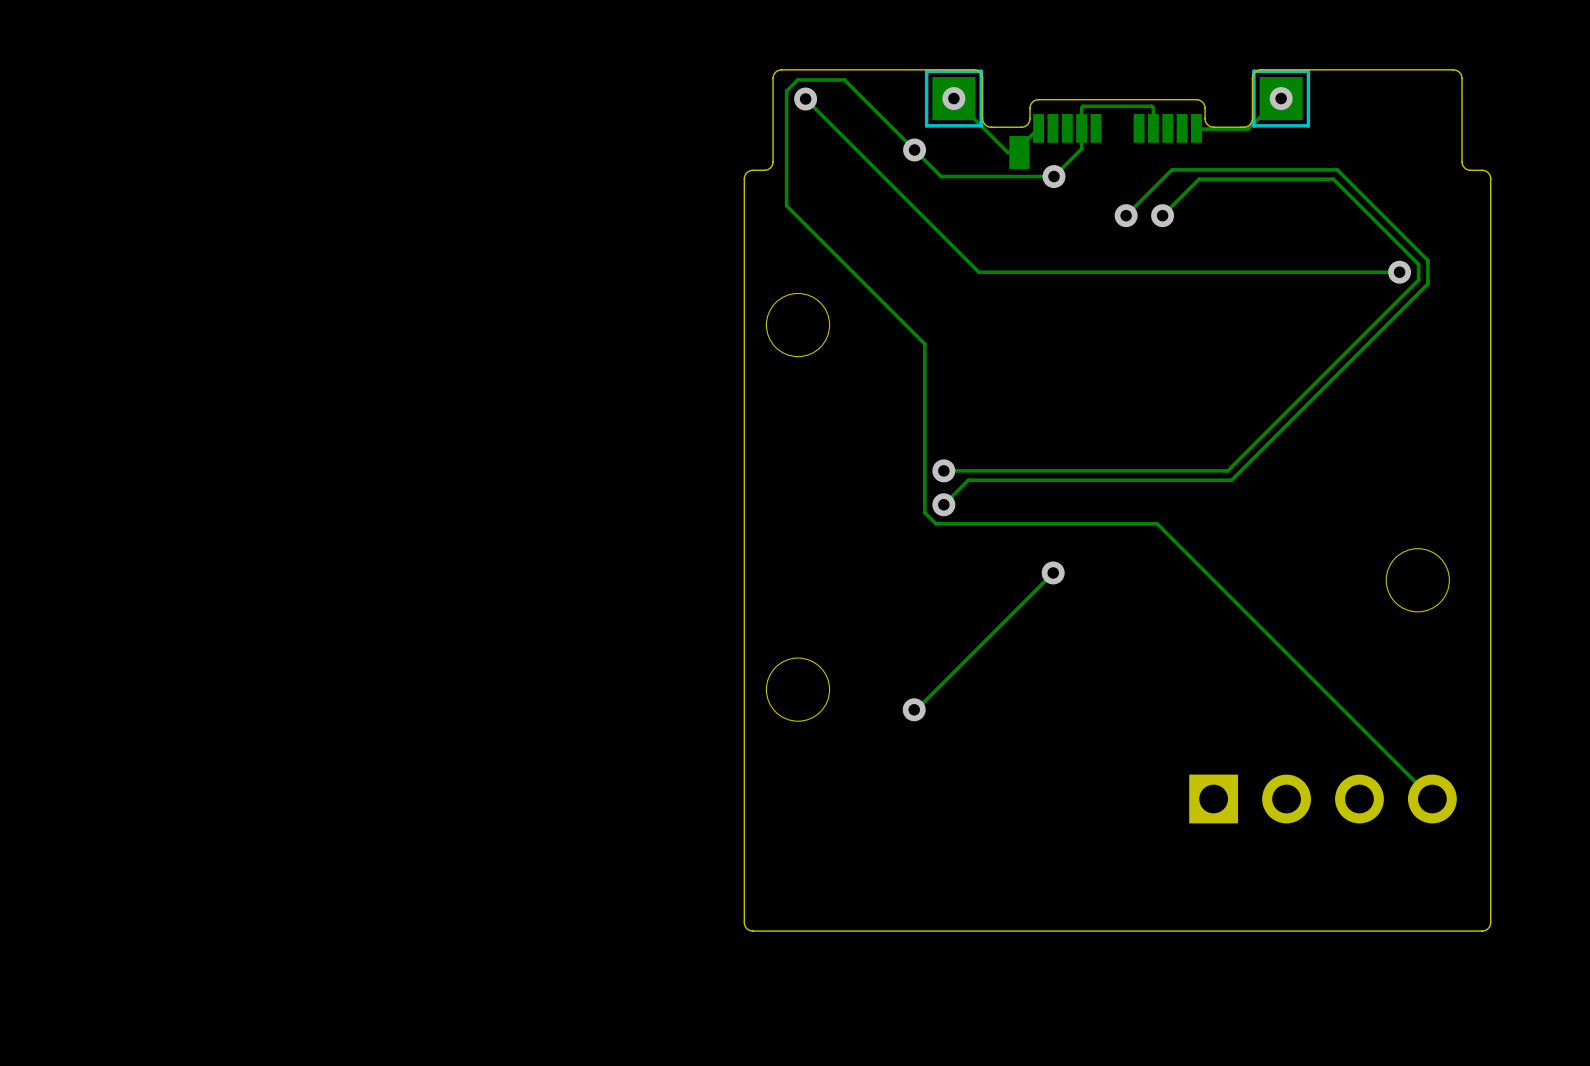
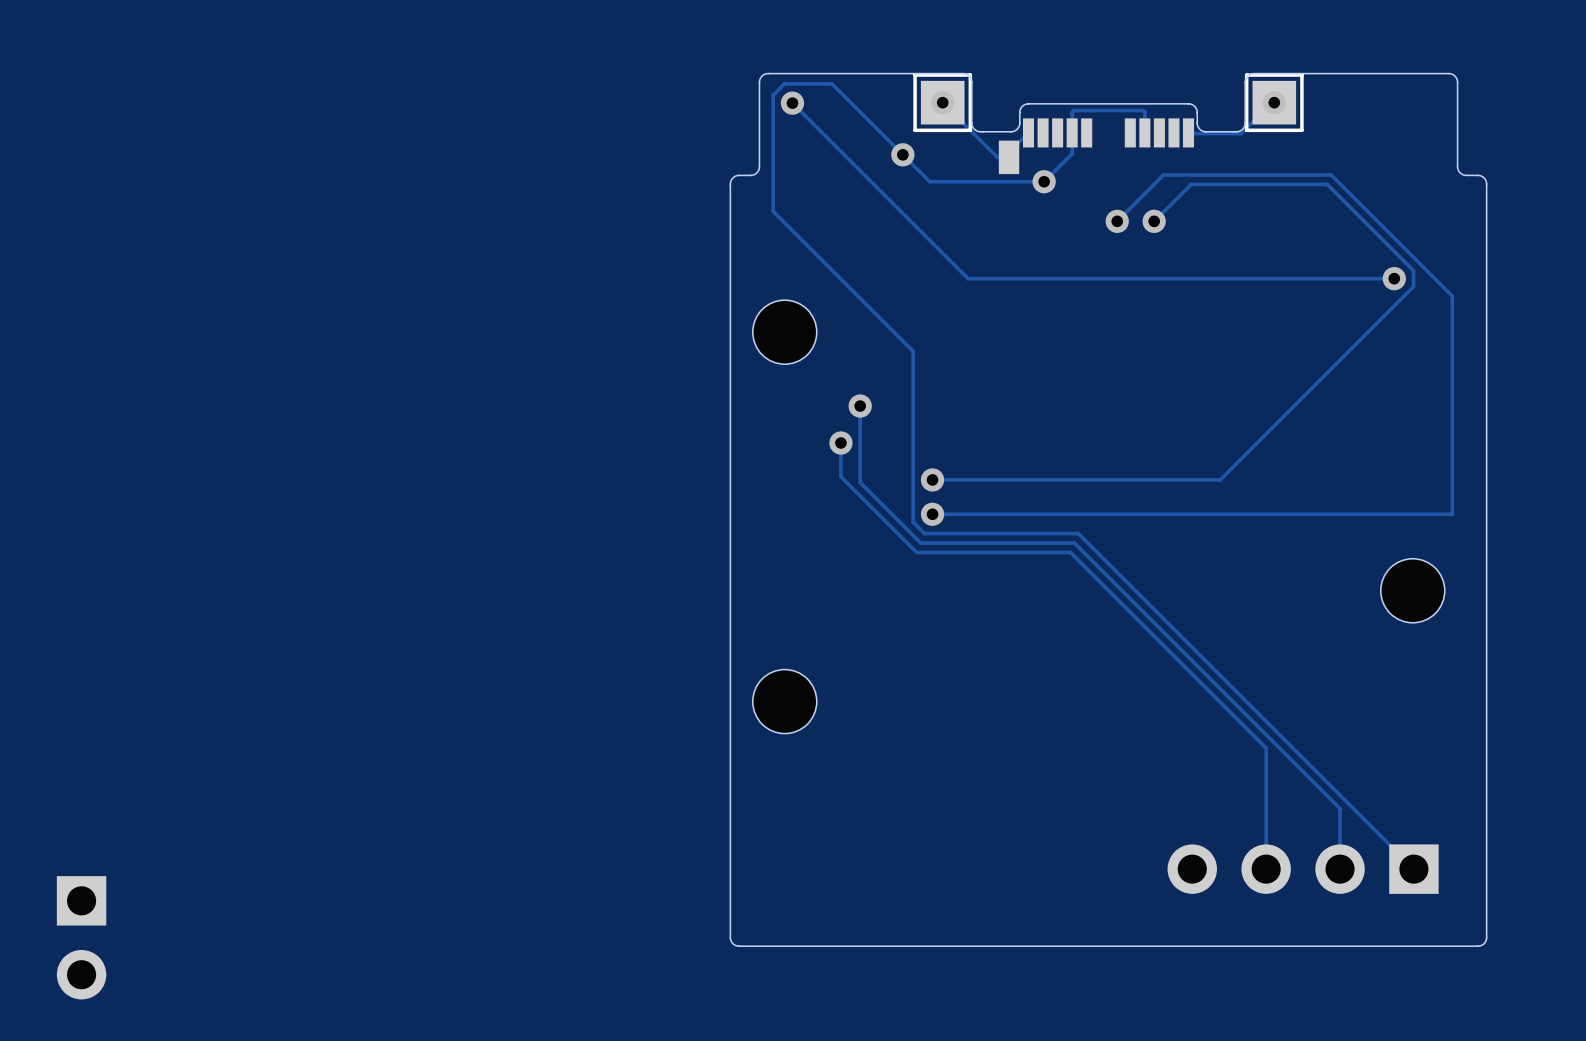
track: (1427, 260) (1427, 283) (1231, 480) (968, 480) (943, 504) -> (1423, 266) (1452, 296) (1452, 514) (932, 514)
track: none -> (860, 406) (860, 482) (920, 543) (1074, 543) (1340, 808) (1340, 869)
via: none -> (860, 406)
track: none -> (840, 443) (840, 476) (916, 552) (1070, 552) (1266, 748) (1266, 869)
via: none -> (840, 443)
track: (1087, 523) (1157, 523) (1432, 799) -> (1078, 533) (1413, 869)
track: (1053, 572) (916, 709) (914, 709) -> none
via: (1053, 572) -> none
via: (914, 709) -> none
part rotation: 0° (1323, 799) -> 180° (1303, 869)
part: none -> (81, 937)

